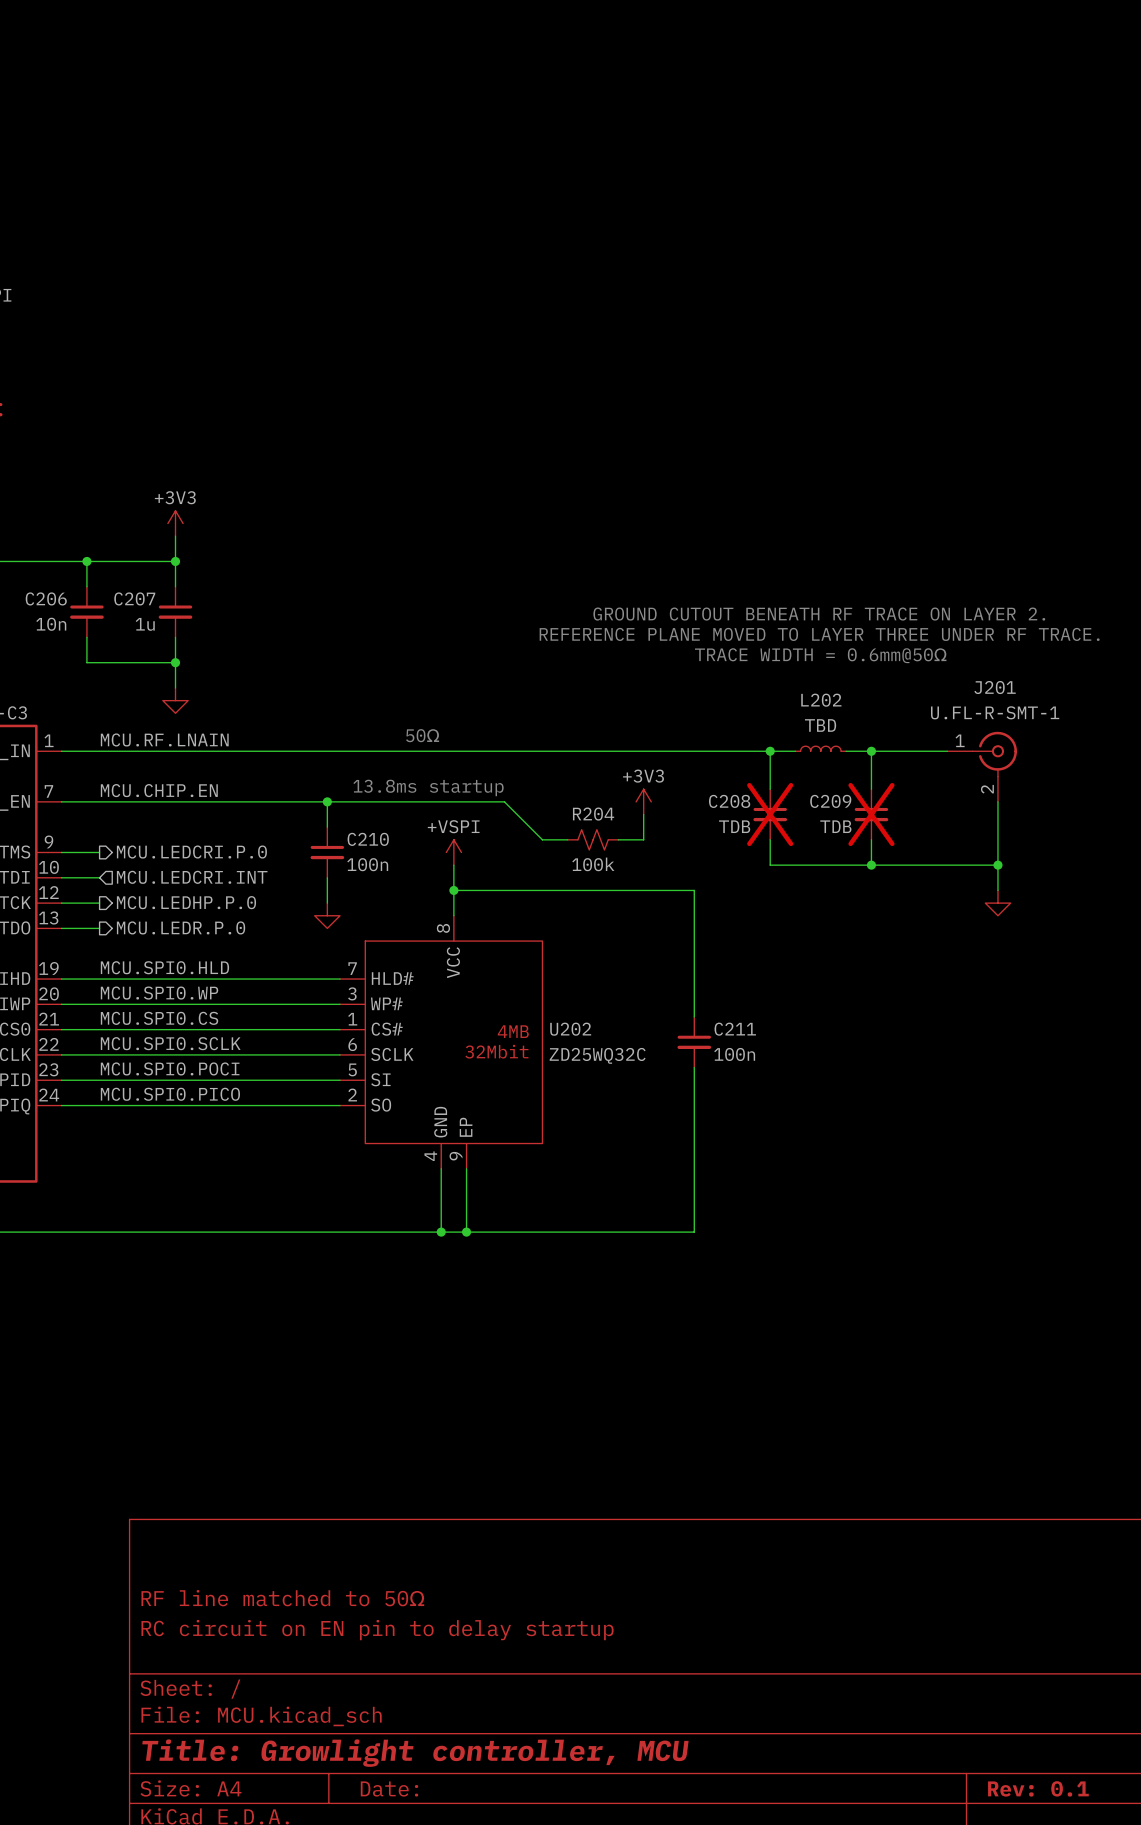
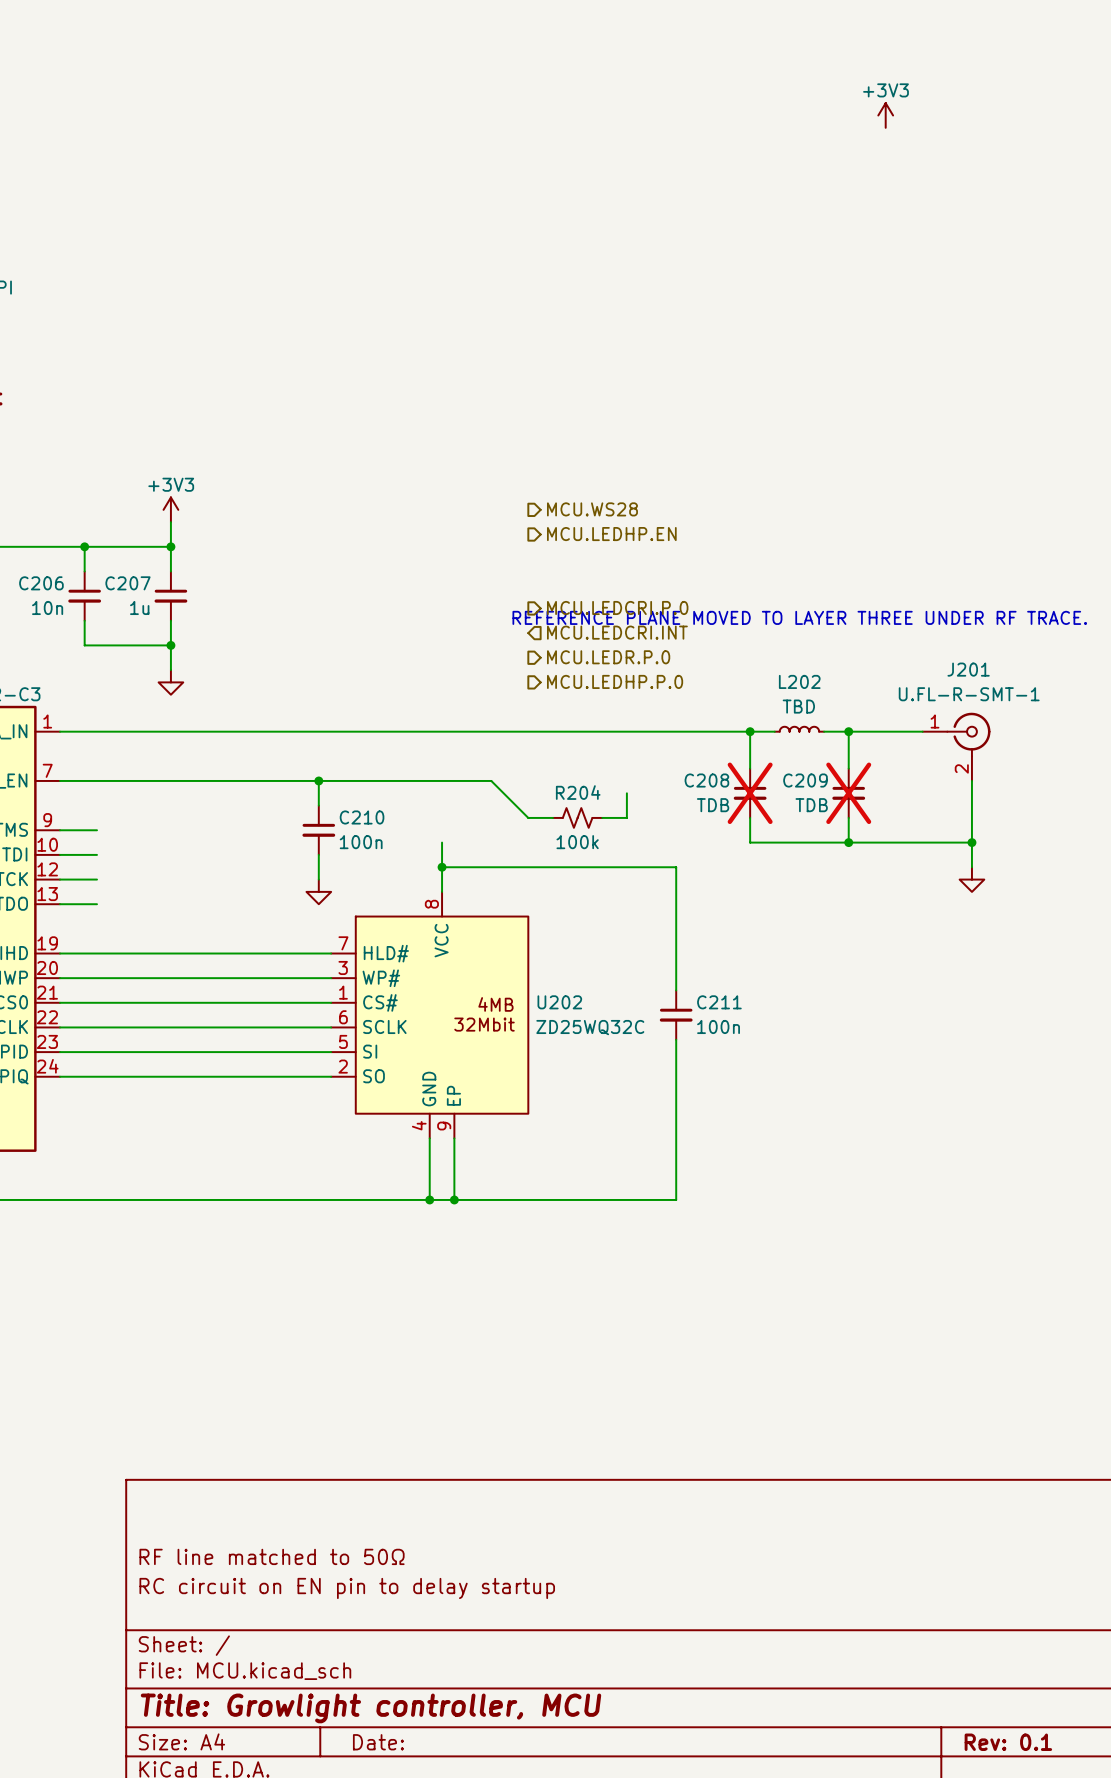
power symbol: none -> +3V3 (885, 115)
hierarchical label: none -> MCU.WS28 (592, 509)
hierarchical label: none -> MCU.LEDHP.EN (611, 534)
text: GROUND CUTOUT BENEATH RF TRACE ON LAYER 2. (819, 614) -> none
hierarchical label: none -> MCU.LEDCRI.P.0 (617, 607)
hierarchical label: none -> MCU.LEDCRI.INT (617, 632)
text: TRACE WIDTH = 0.6mm@50Ω (820, 655) -> none
hierarchical label: none -> MCU.LEDR.P.0 (608, 657)
hierarchical label: none -> MCU.LEDHP.P.0 (615, 681)
text: 50Ω (422, 735) -> none
label: MCU.RF.LNAIN (164, 739) -> none
text: 13.8ms startup (428, 787) -> none
label: MCU.CHIP.EN (159, 790) -> none
power symbol: +3V3 (643, 801) -> none
hierarchical label: MCU.LEDCRI.P.0 (191, 852) -> none
power symbol: +VSPI (453, 852) -> none
hierarchical label: MCU.LEDCRI.INT (192, 877) -> none
hierarchical label: MCU.LEDHP.P.0 (186, 902) -> none
hierarchical label: MCU.LEDR.P.0 (181, 927) -> none
label: MCU.SPI0.HLD (164, 967) -> none
label: MCU.SPI0.WP (159, 993) -> none
label: MCU.SPI0.CS (159, 1018) -> none
label: MCU.SPI0.SCLK (170, 1043) -> none
label: MCU.SPI0.POCI (170, 1068) -> none
label: MCU.SPI0.PICO (170, 1094) -> none

